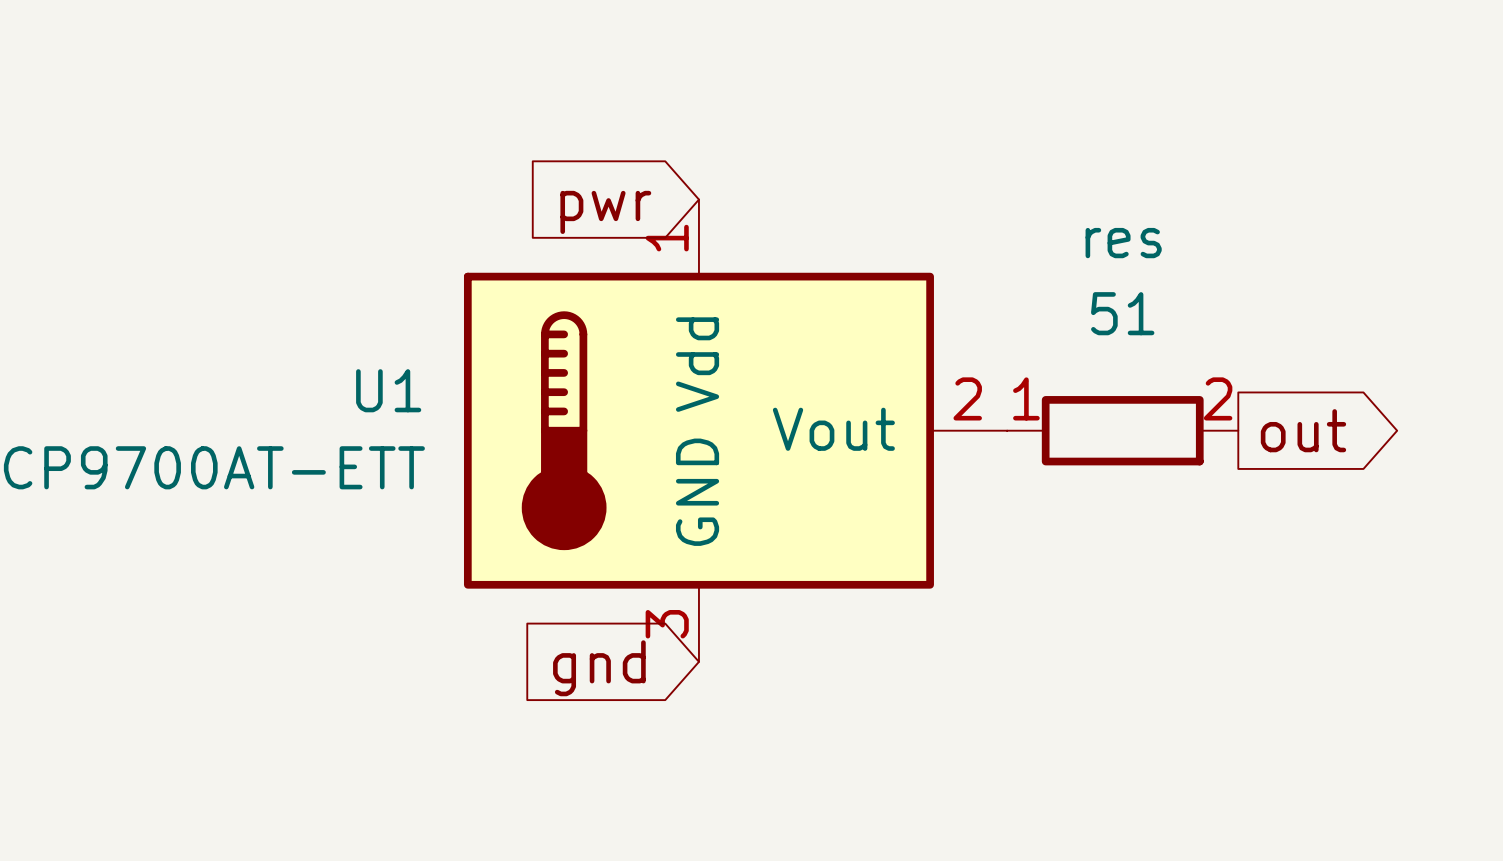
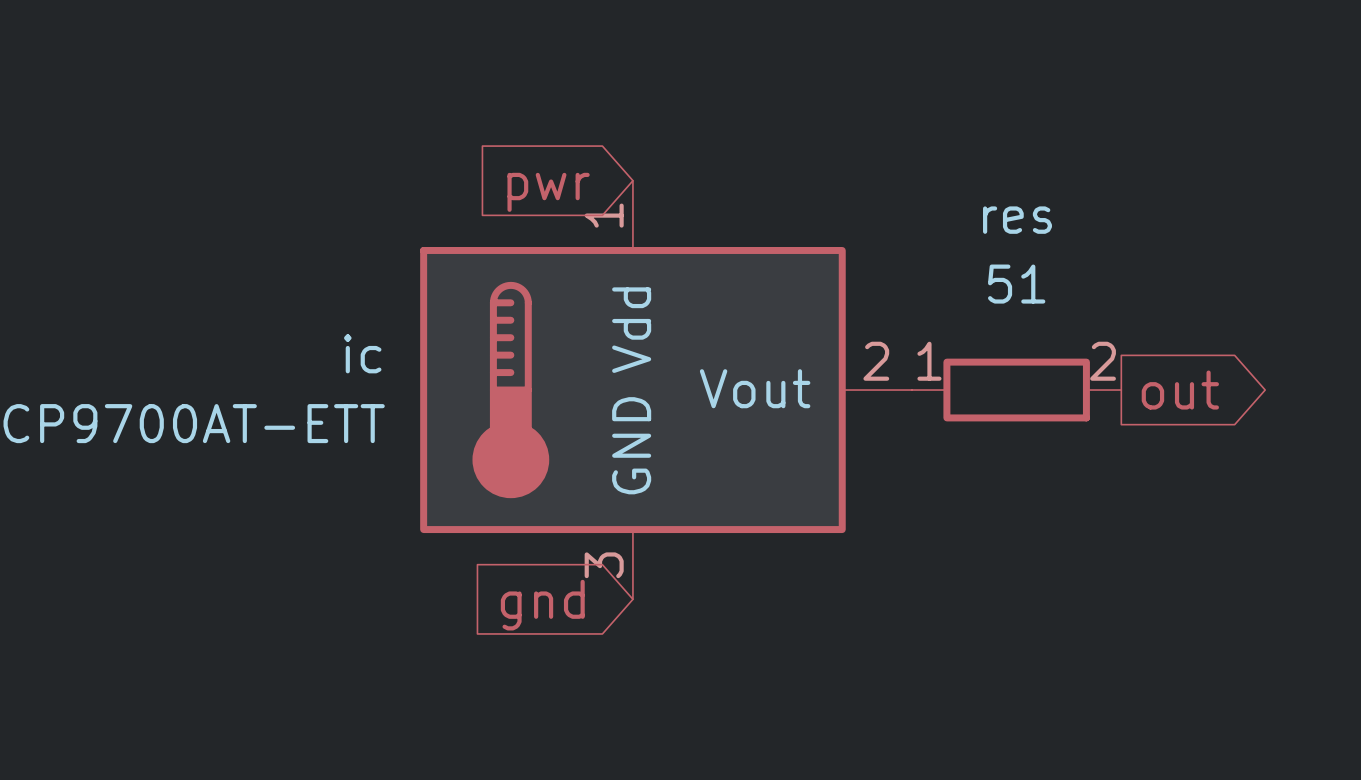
U1 name: U1 (388, 390) -> ic (362, 353)

